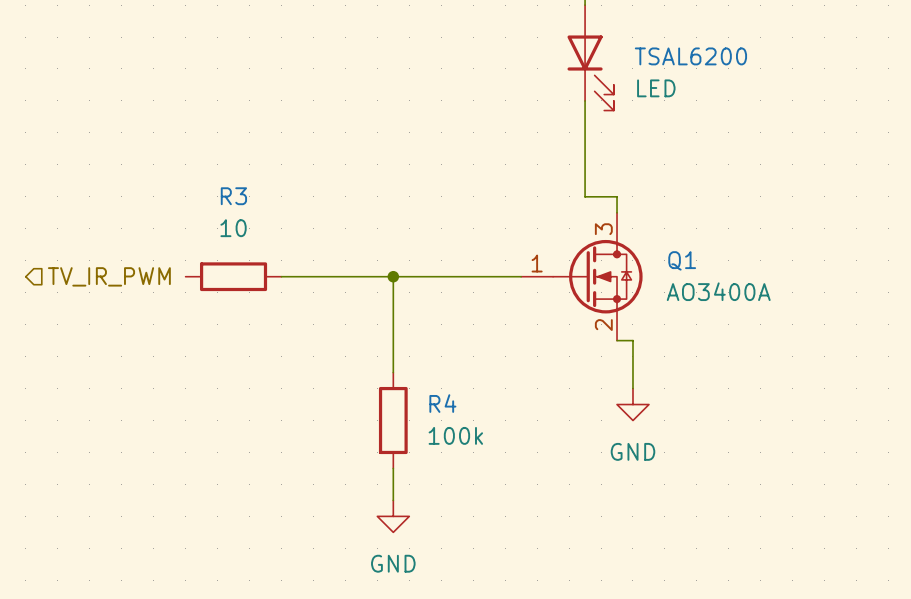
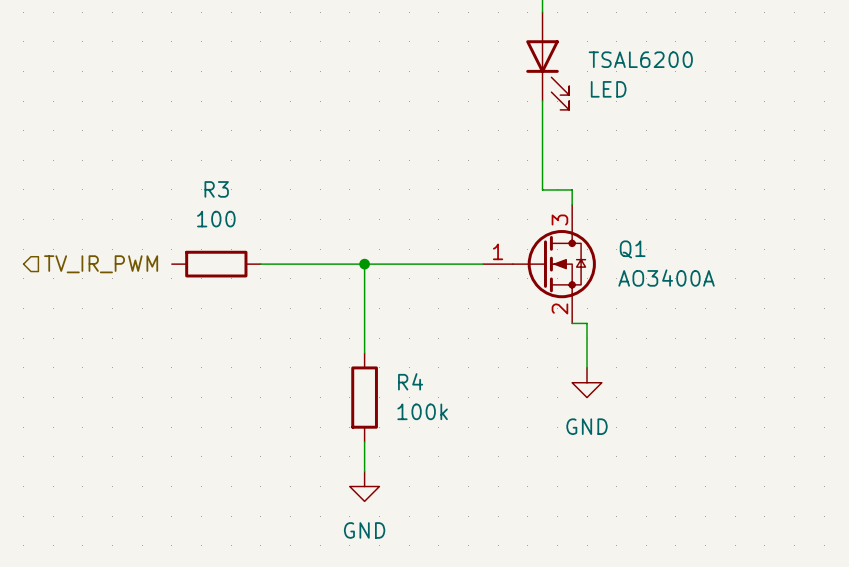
R3 value: 10 (233, 228) -> 100 (216, 219)

